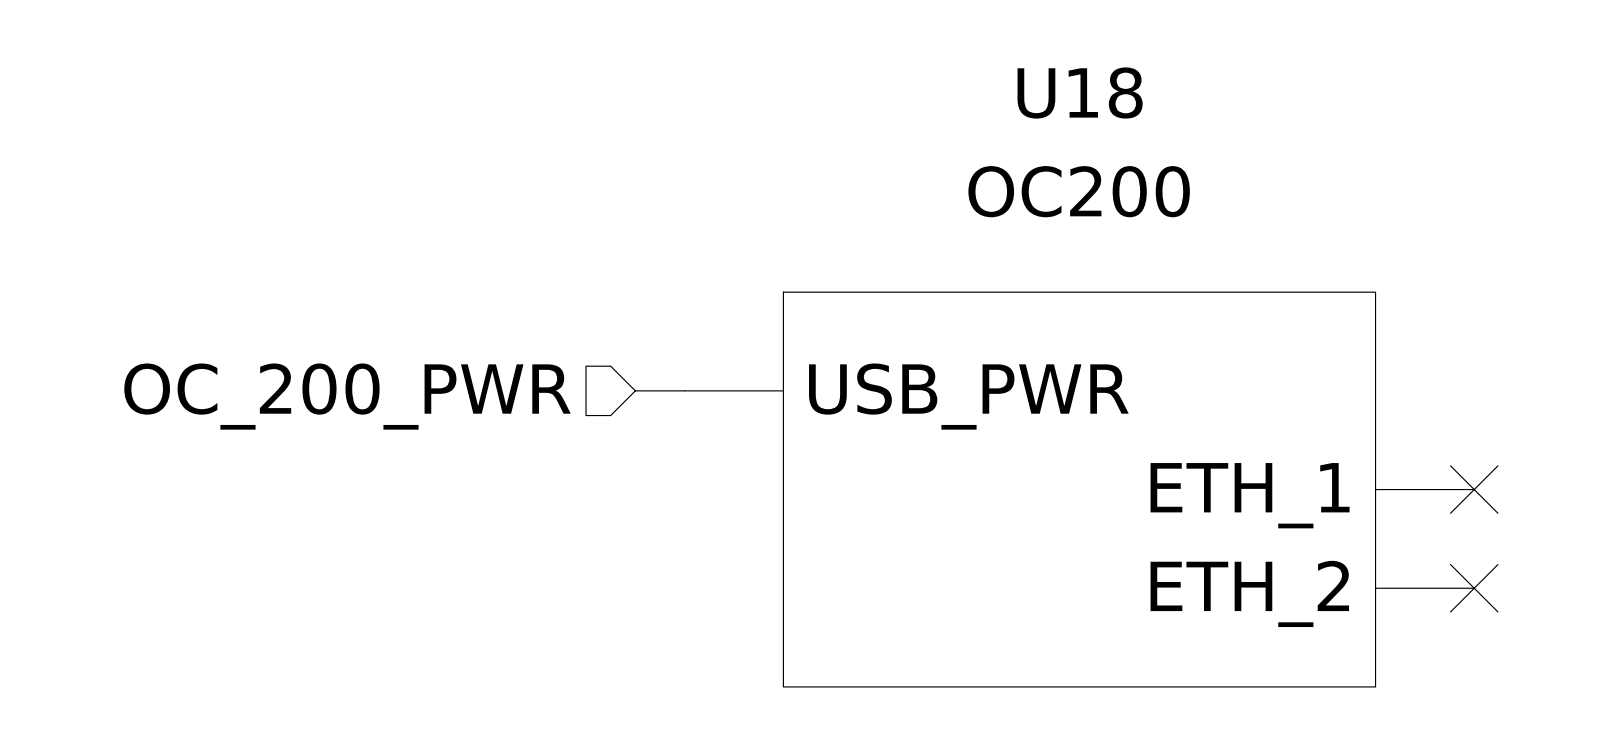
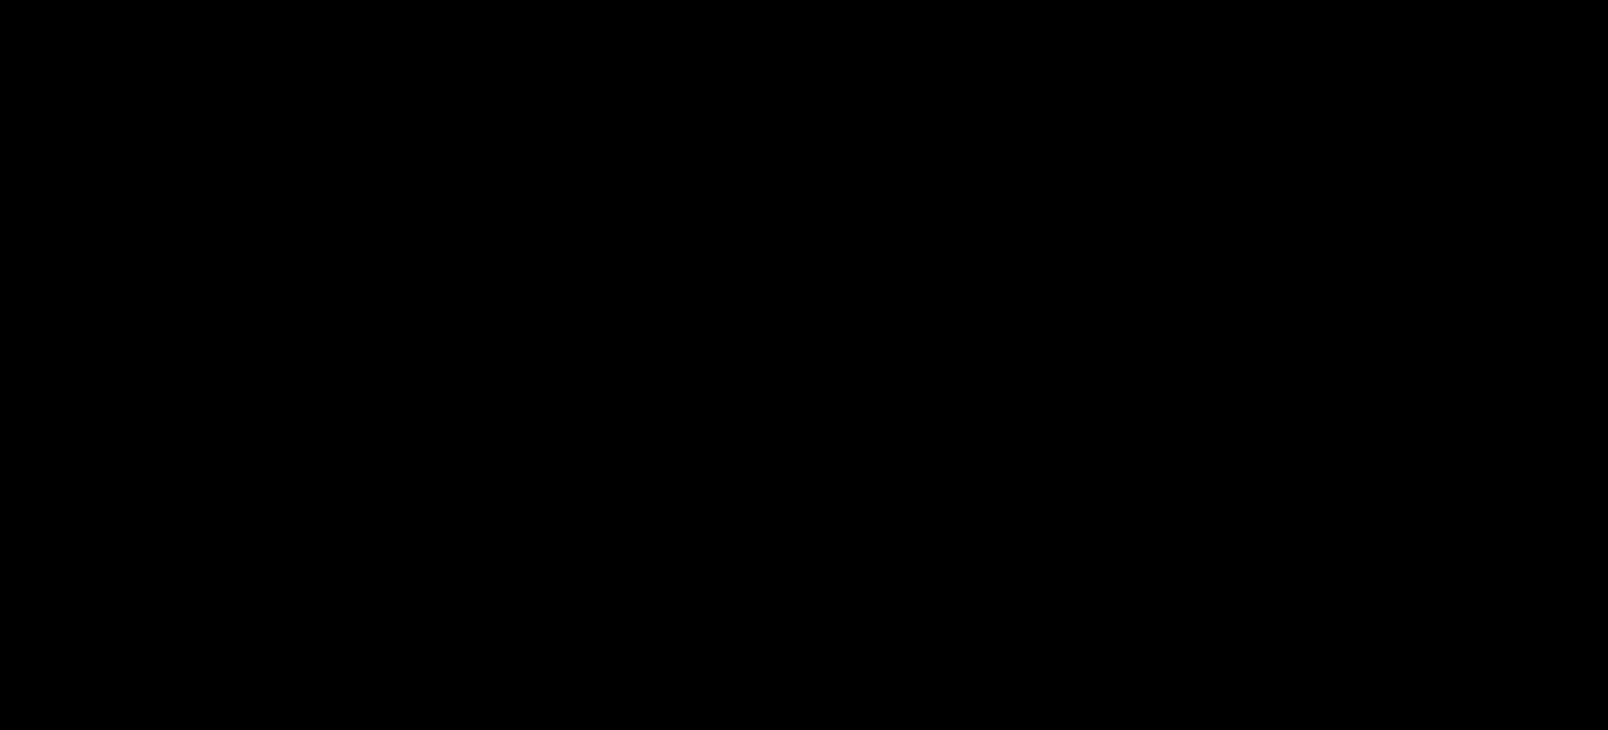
wire: (635, 390) (684, 390) -> none
hierarchical label: OC_200_PWR (347, 396) -> none
U18: OC200 (1079, 489) -> none
no-connect mark: (1474, 489) -> none
no-connect mark: (1474, 588) -> none

